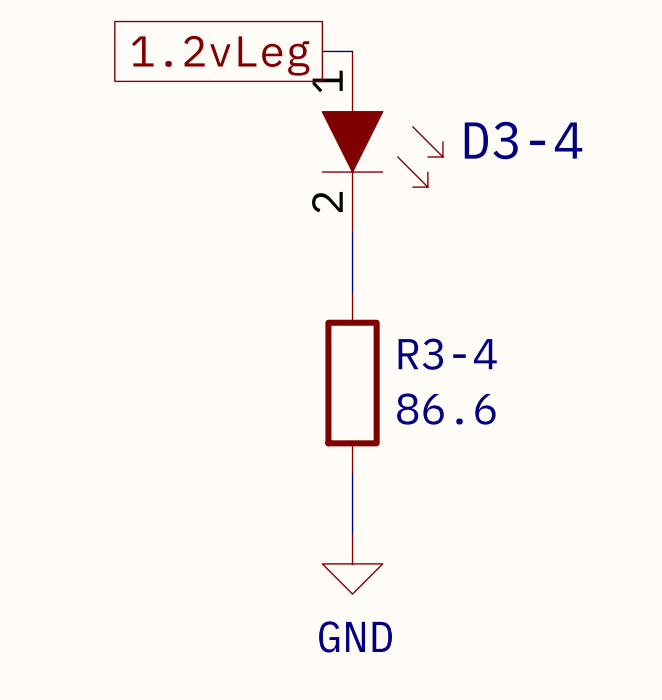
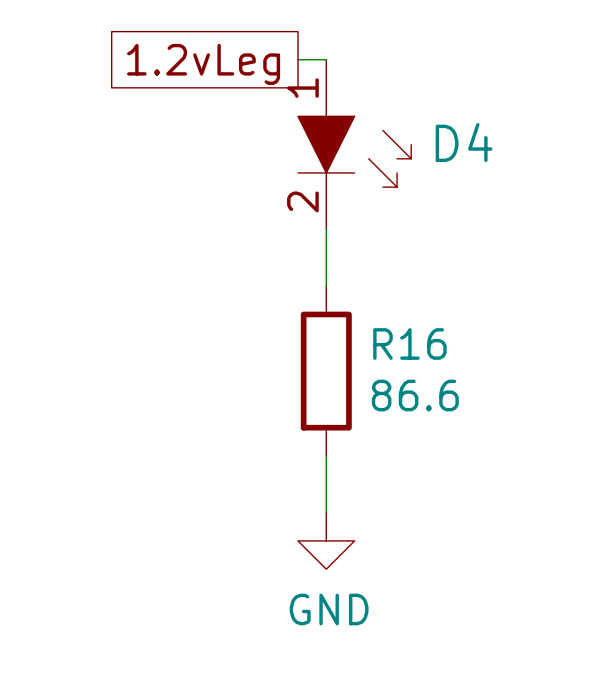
D3-4 name: D3-4 (523, 140) -> D4 (464, 142)
R3-4 name: R3-4 (447, 354) -> R16 (409, 343)

